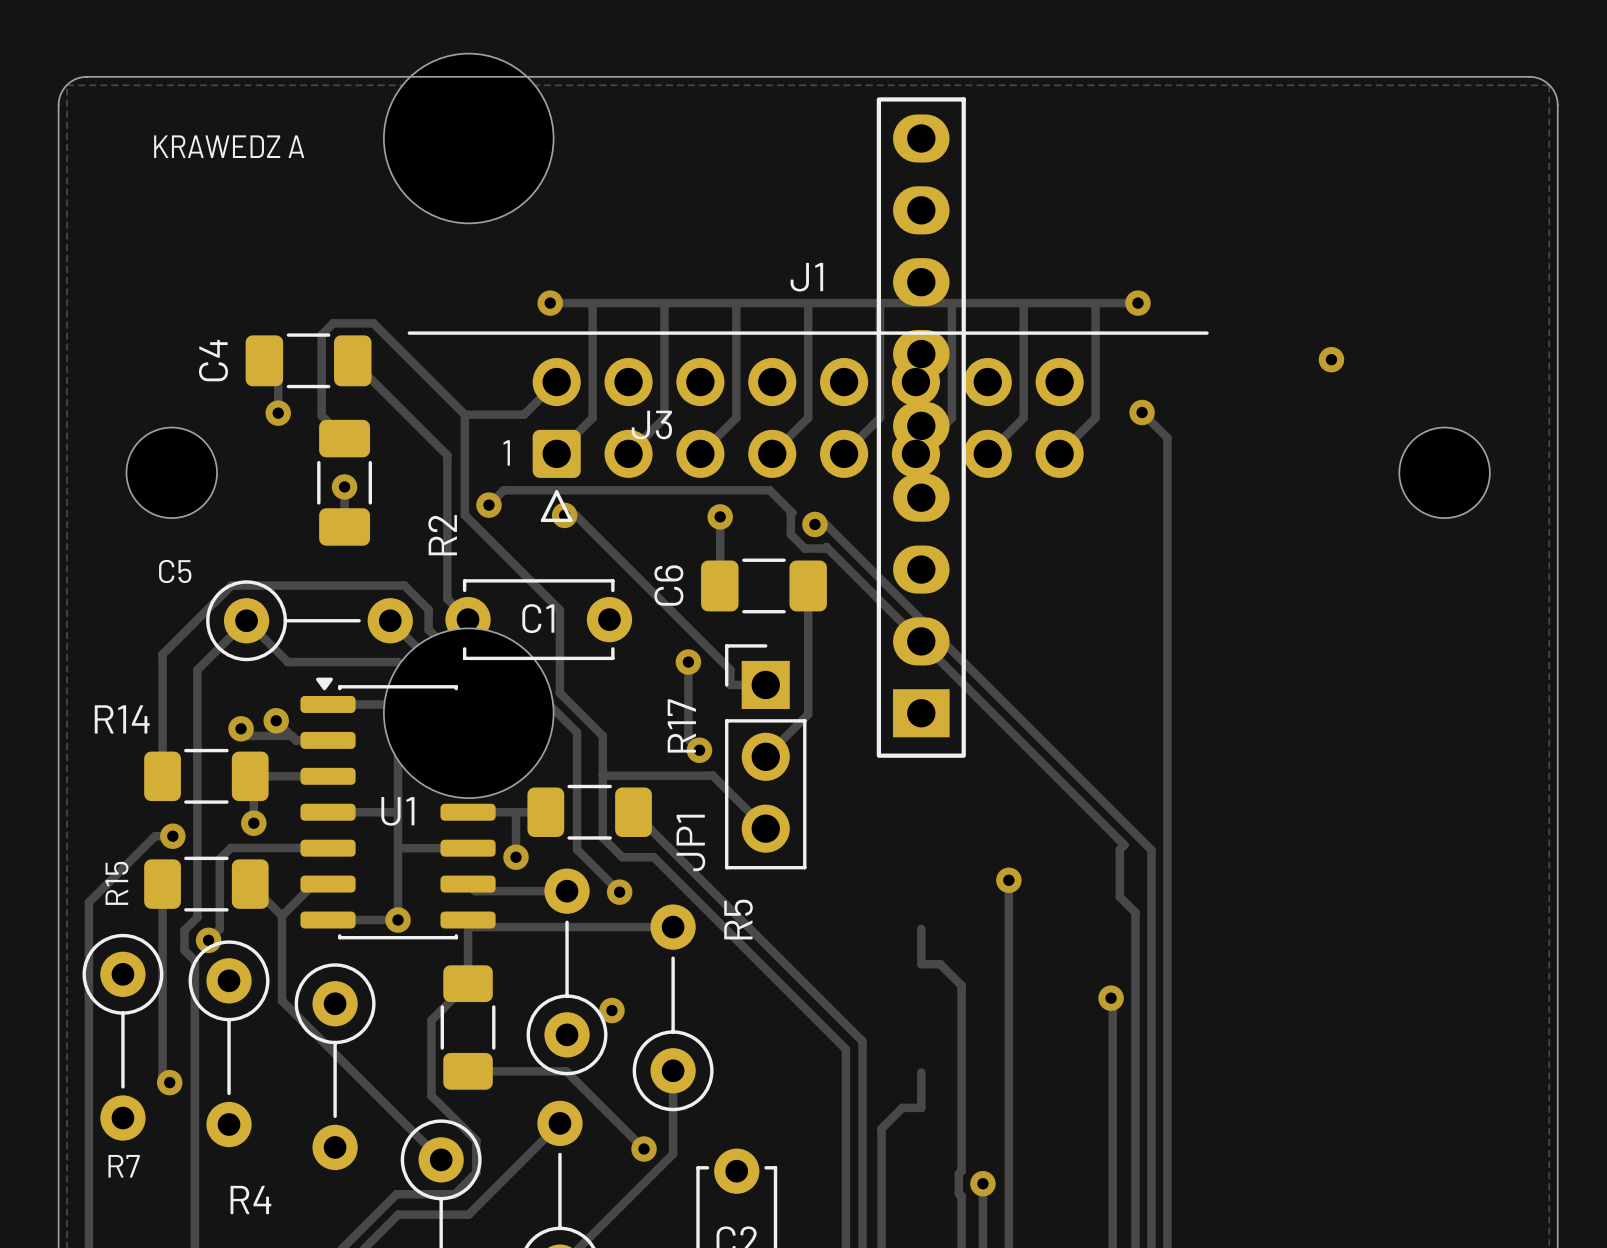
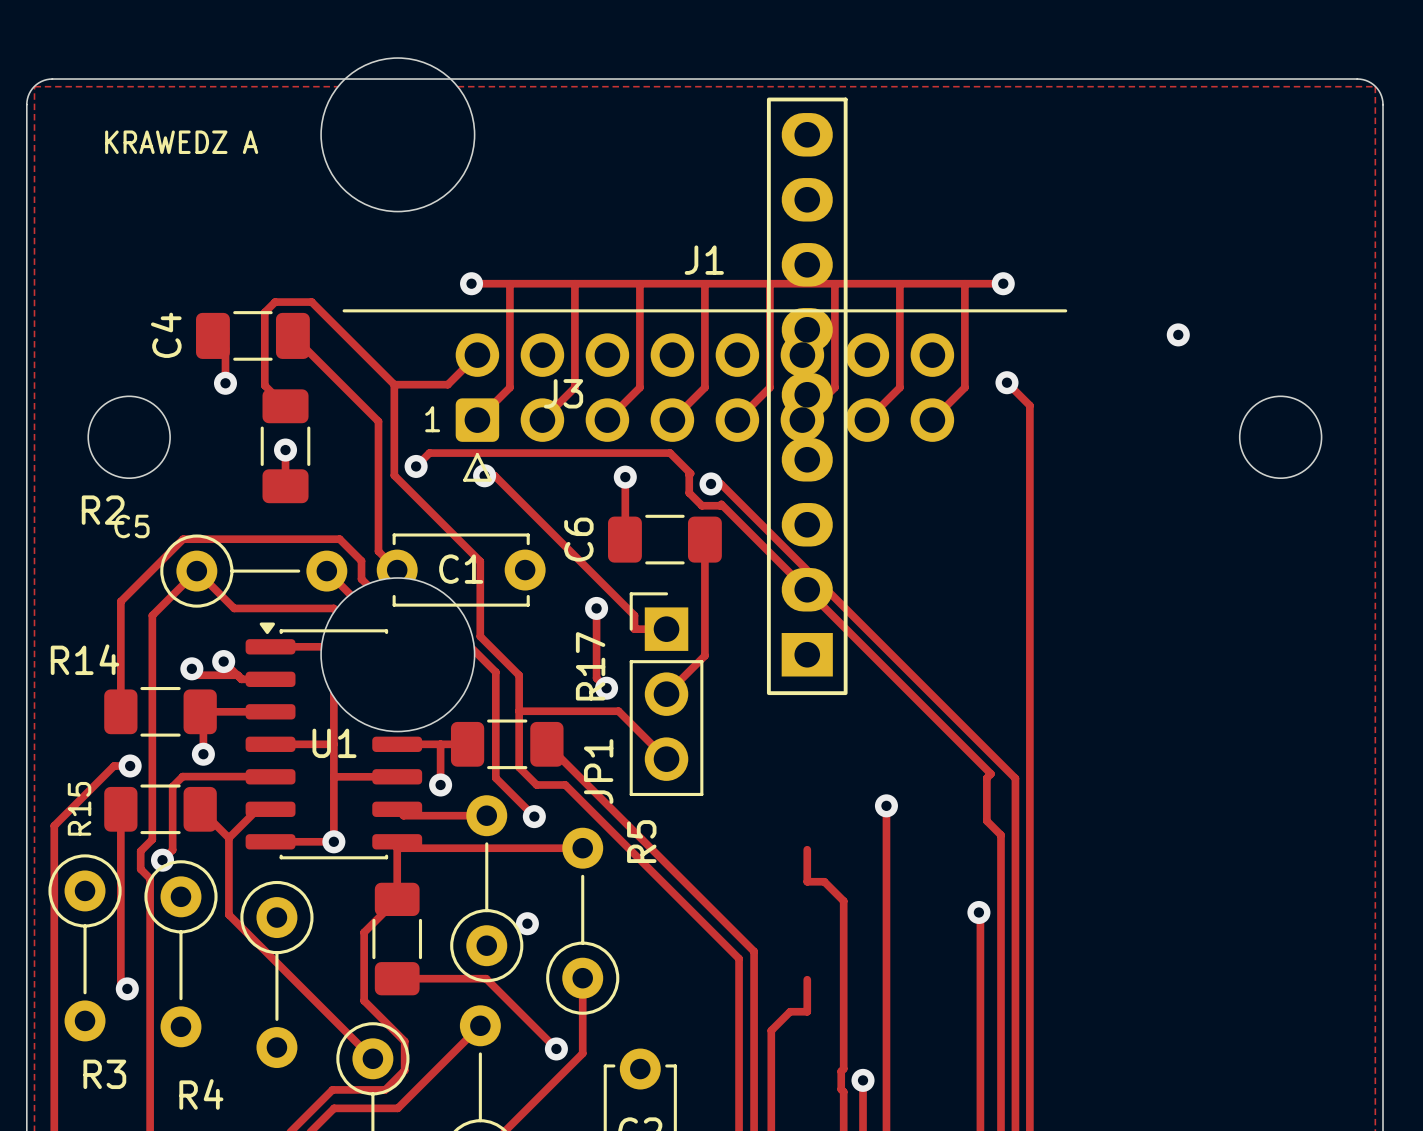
R2 name rotation: 0° (442, 535) -> 90° clockwise (103, 510)
R2 name position: R2 (442, 535) -> R2 (103, 510)
R7 name: R7 (124, 1166) -> none
R3 name: none -> R3 (104, 1074)

